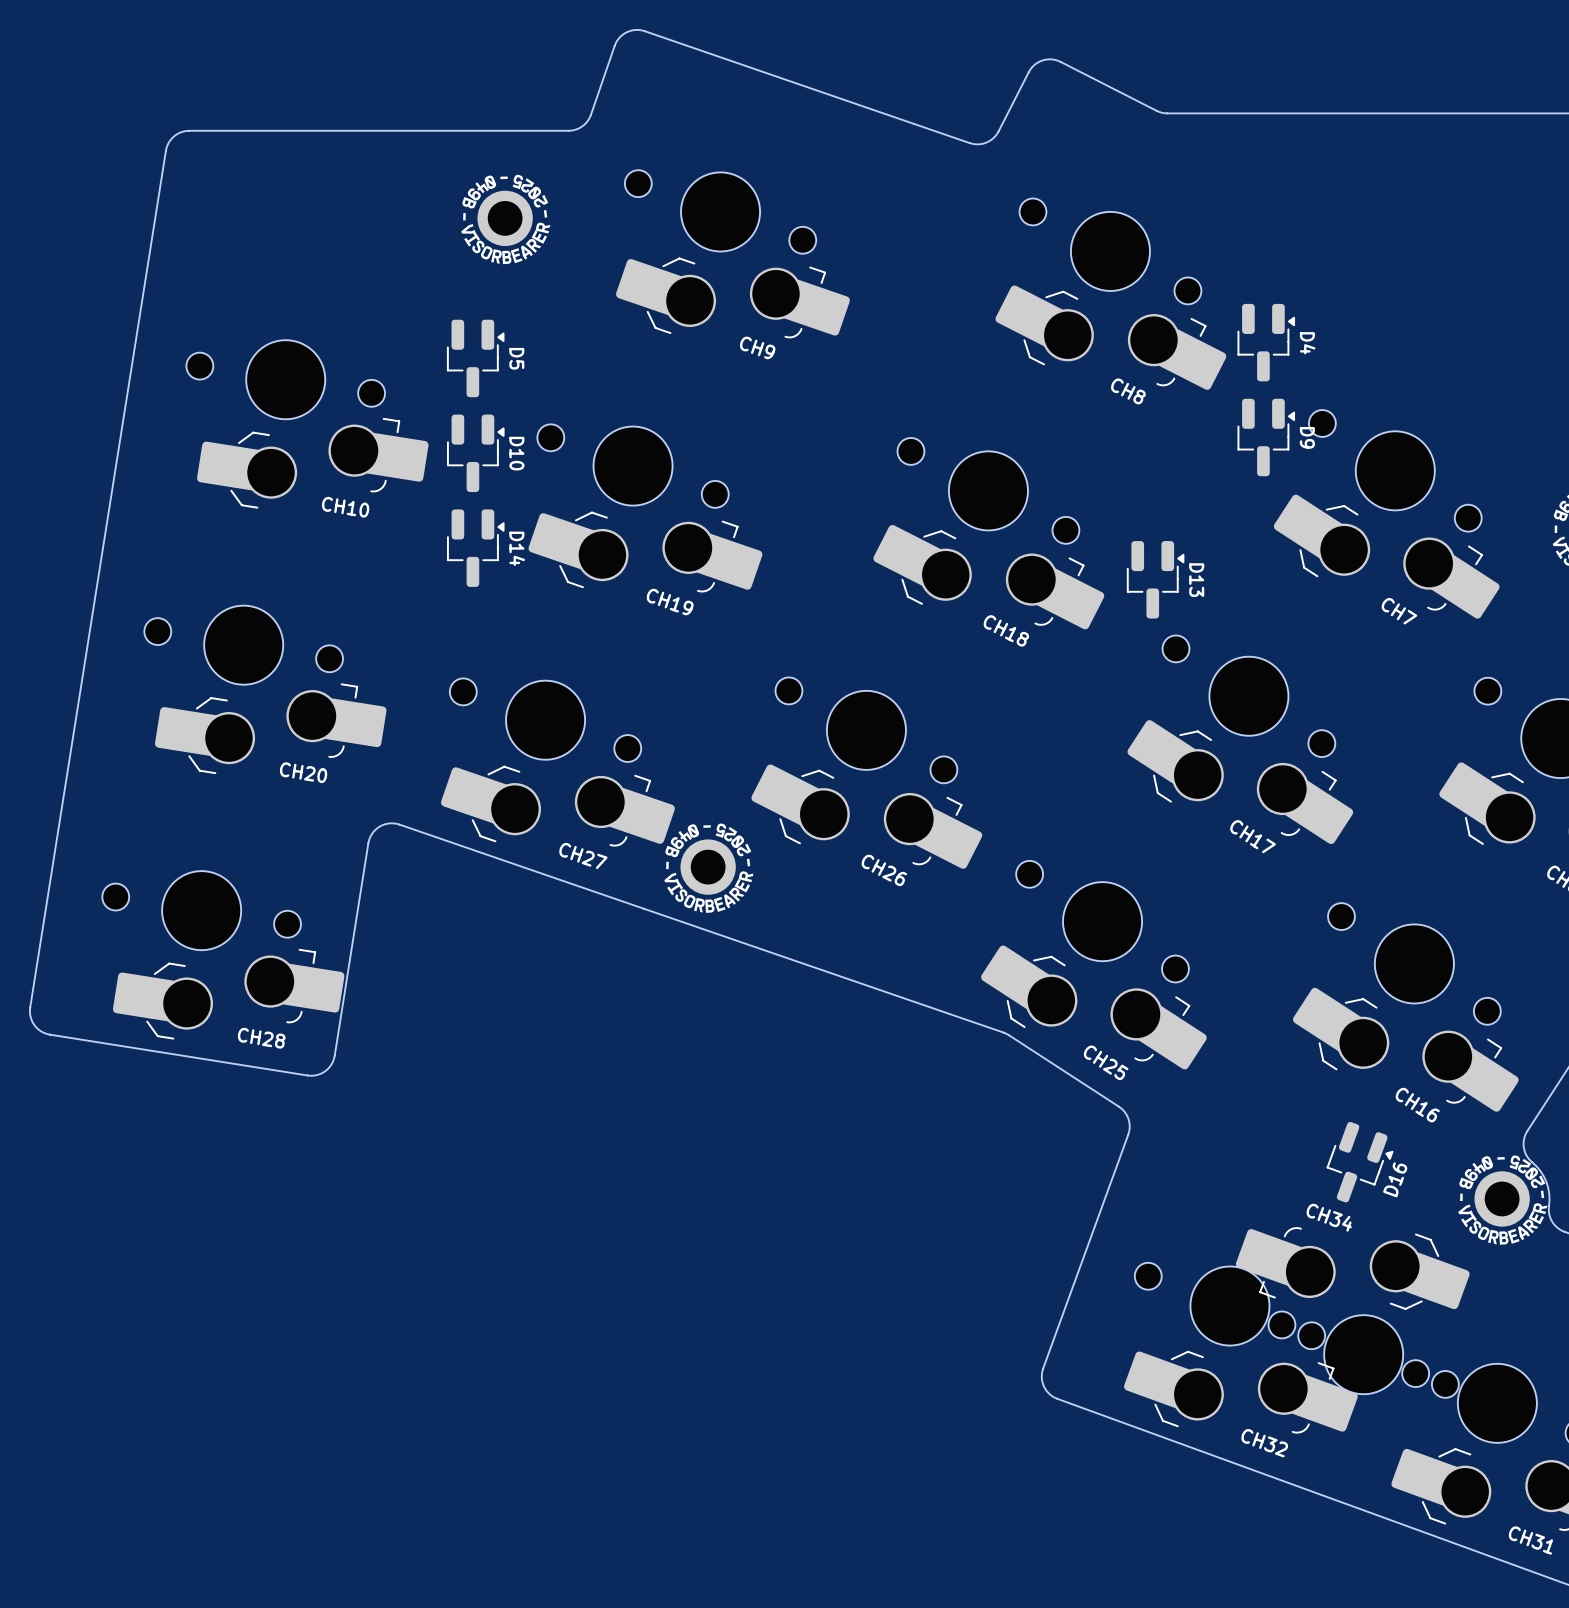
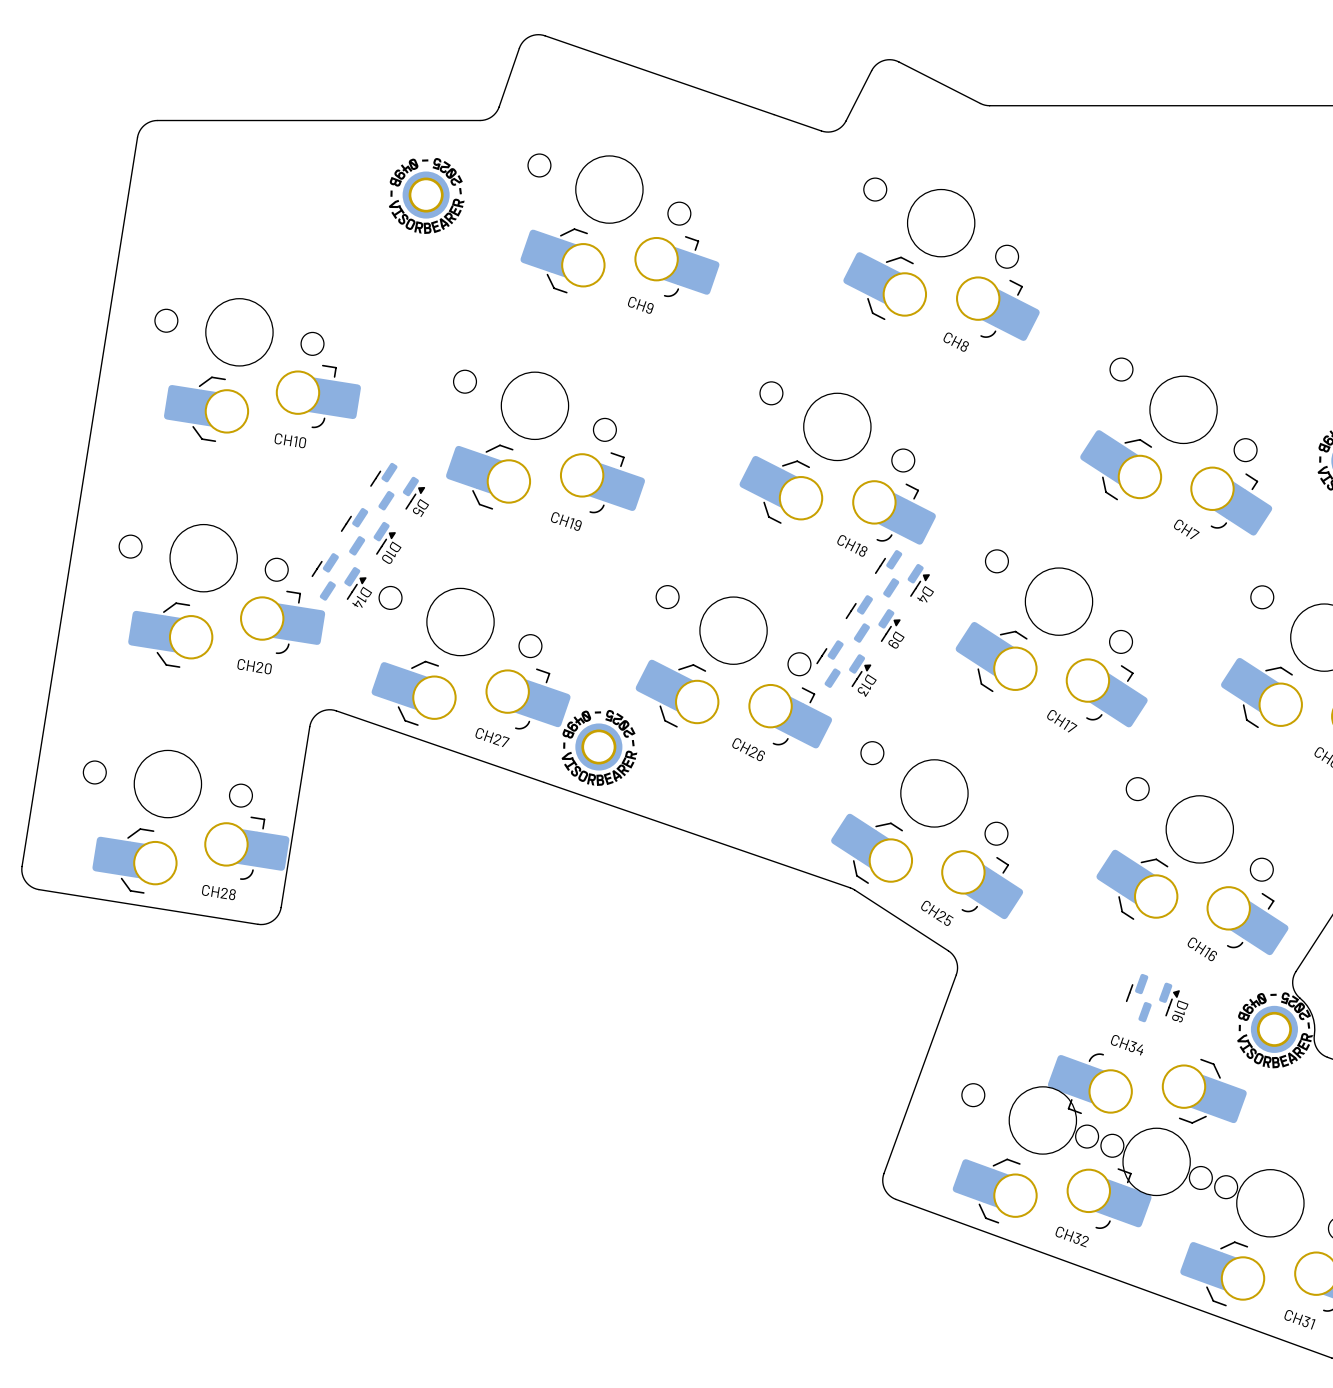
D4 footprint: [1237, 303, 1296, 382] -> [874, 550, 930, 598]
D5 footprint: [446, 319, 505, 398] -> [370, 462, 426, 511]
D9 footprint: [1237, 398, 1296, 477] -> [845, 595, 901, 643]
D10 footprint: [447, 414, 505, 493] -> [340, 507, 396, 556]
D14 footprint: [447, 509, 505, 587] -> [311, 553, 367, 601]
D13 footprint: [1126, 541, 1185, 619] -> [816, 640, 872, 688]
D16 footprint: [1326, 1121, 1394, 1203] -> [1125, 973, 1180, 1023]
D16 name rotation: 0° (1395, 1179) -> 180° (1180, 1011)

